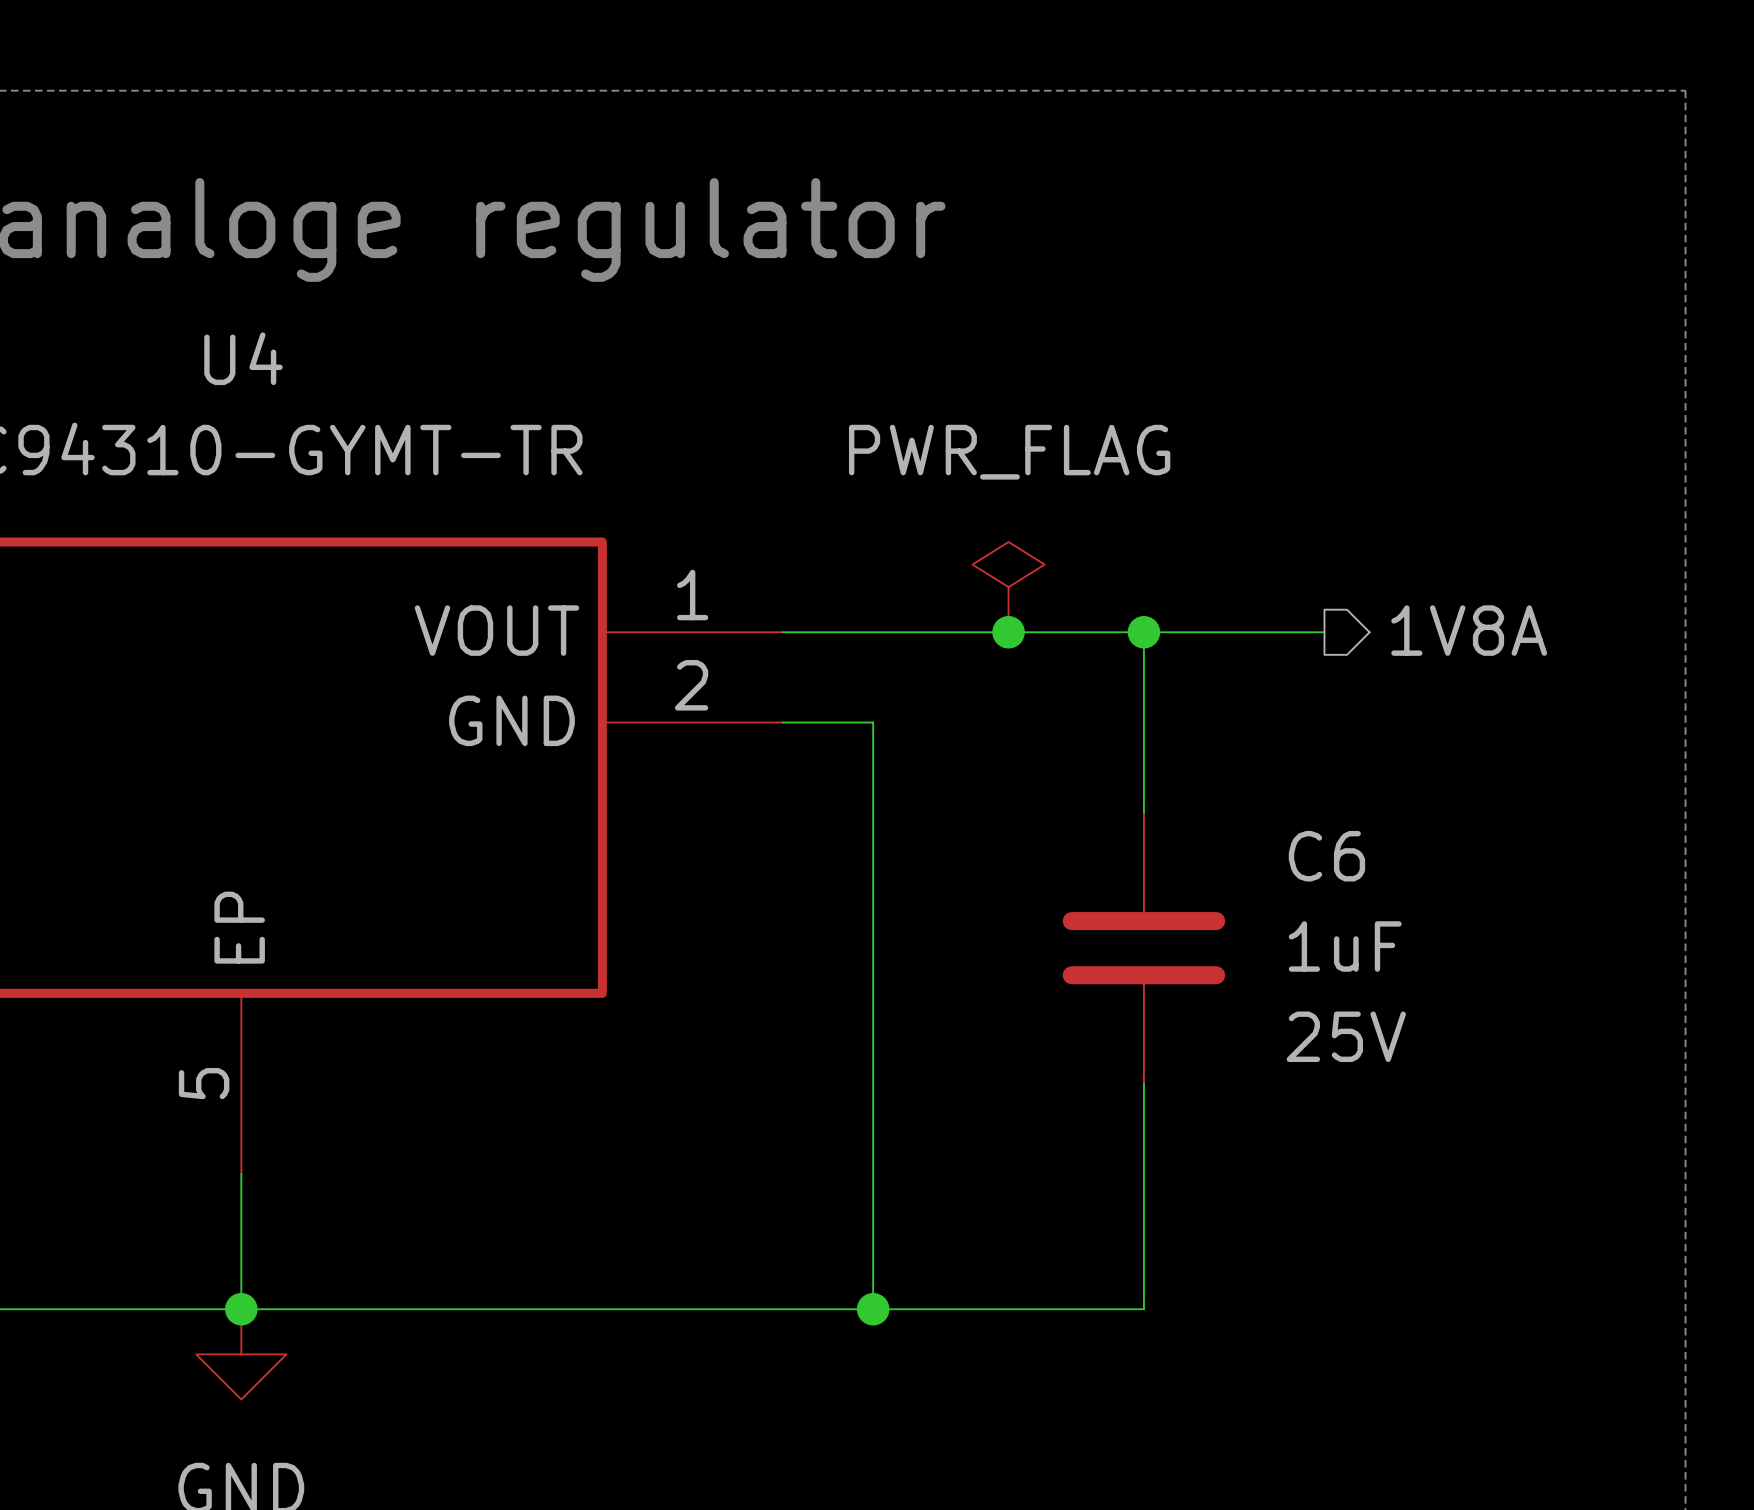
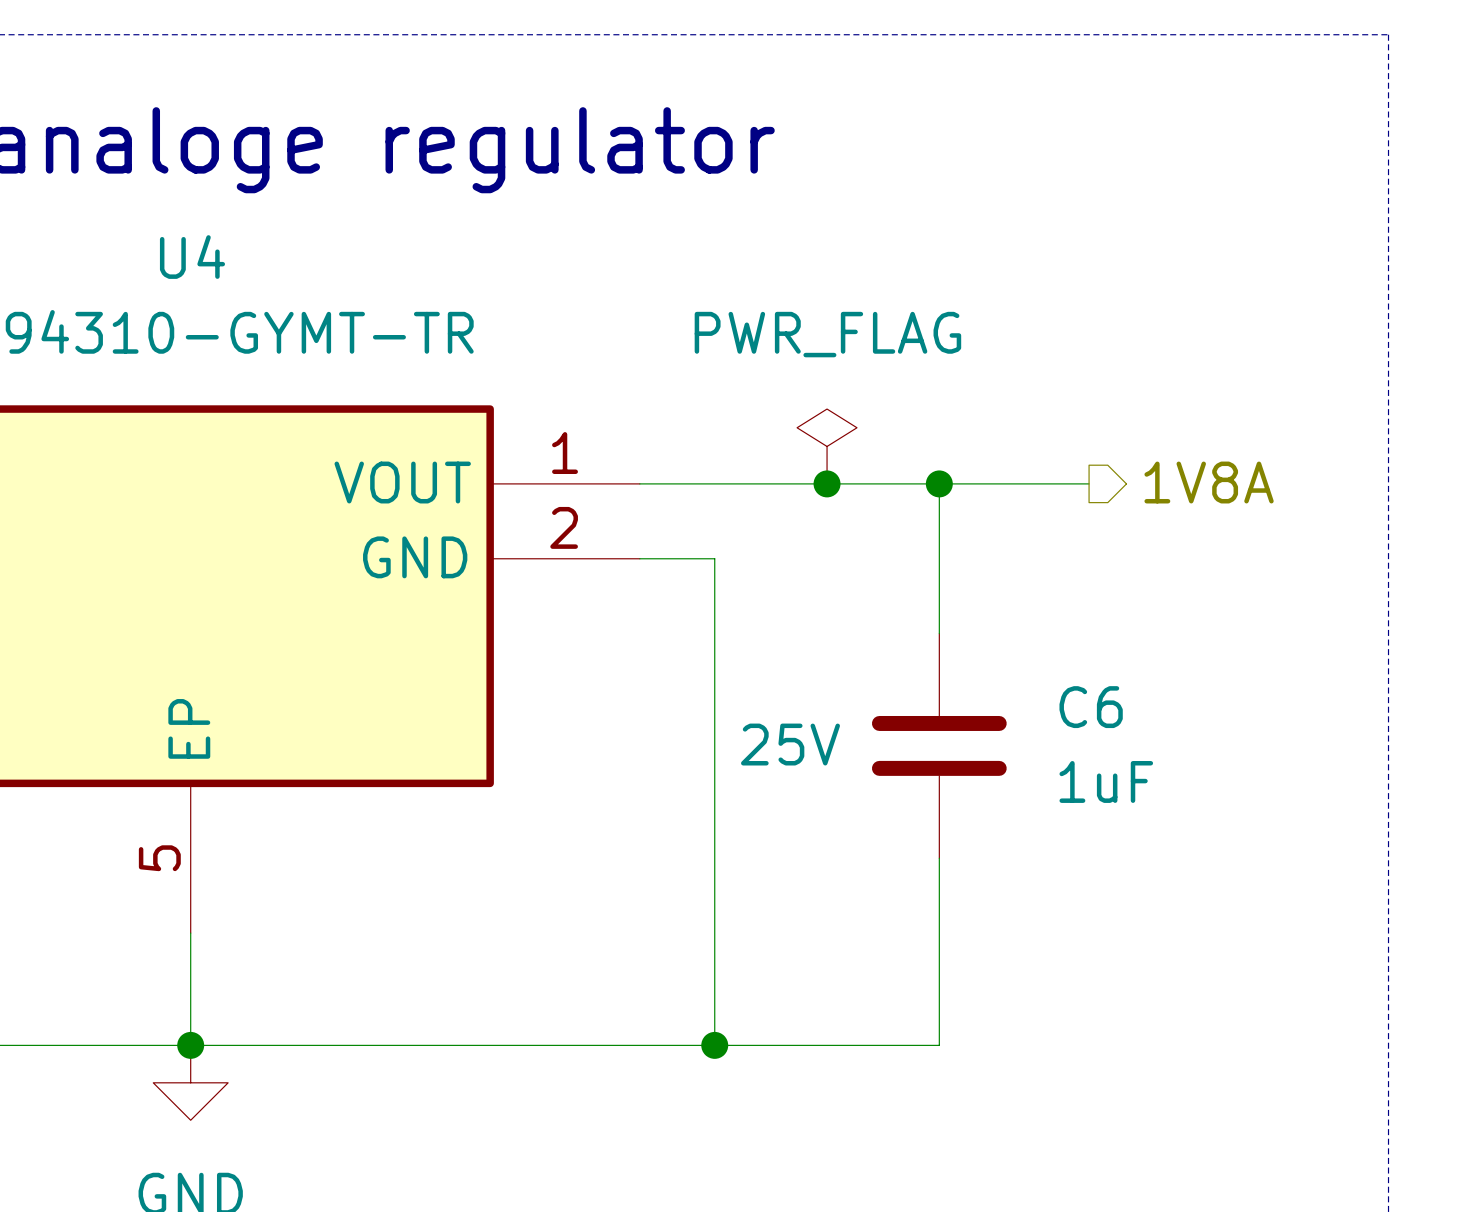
C6 name position: C6 (1326, 856) -> C6 (1091, 707)
C6 value position: 1uF (1345, 946) -> 1uF (1106, 781)
C6 text position: 25V (1346, 1036) -> 25V (790, 744)

